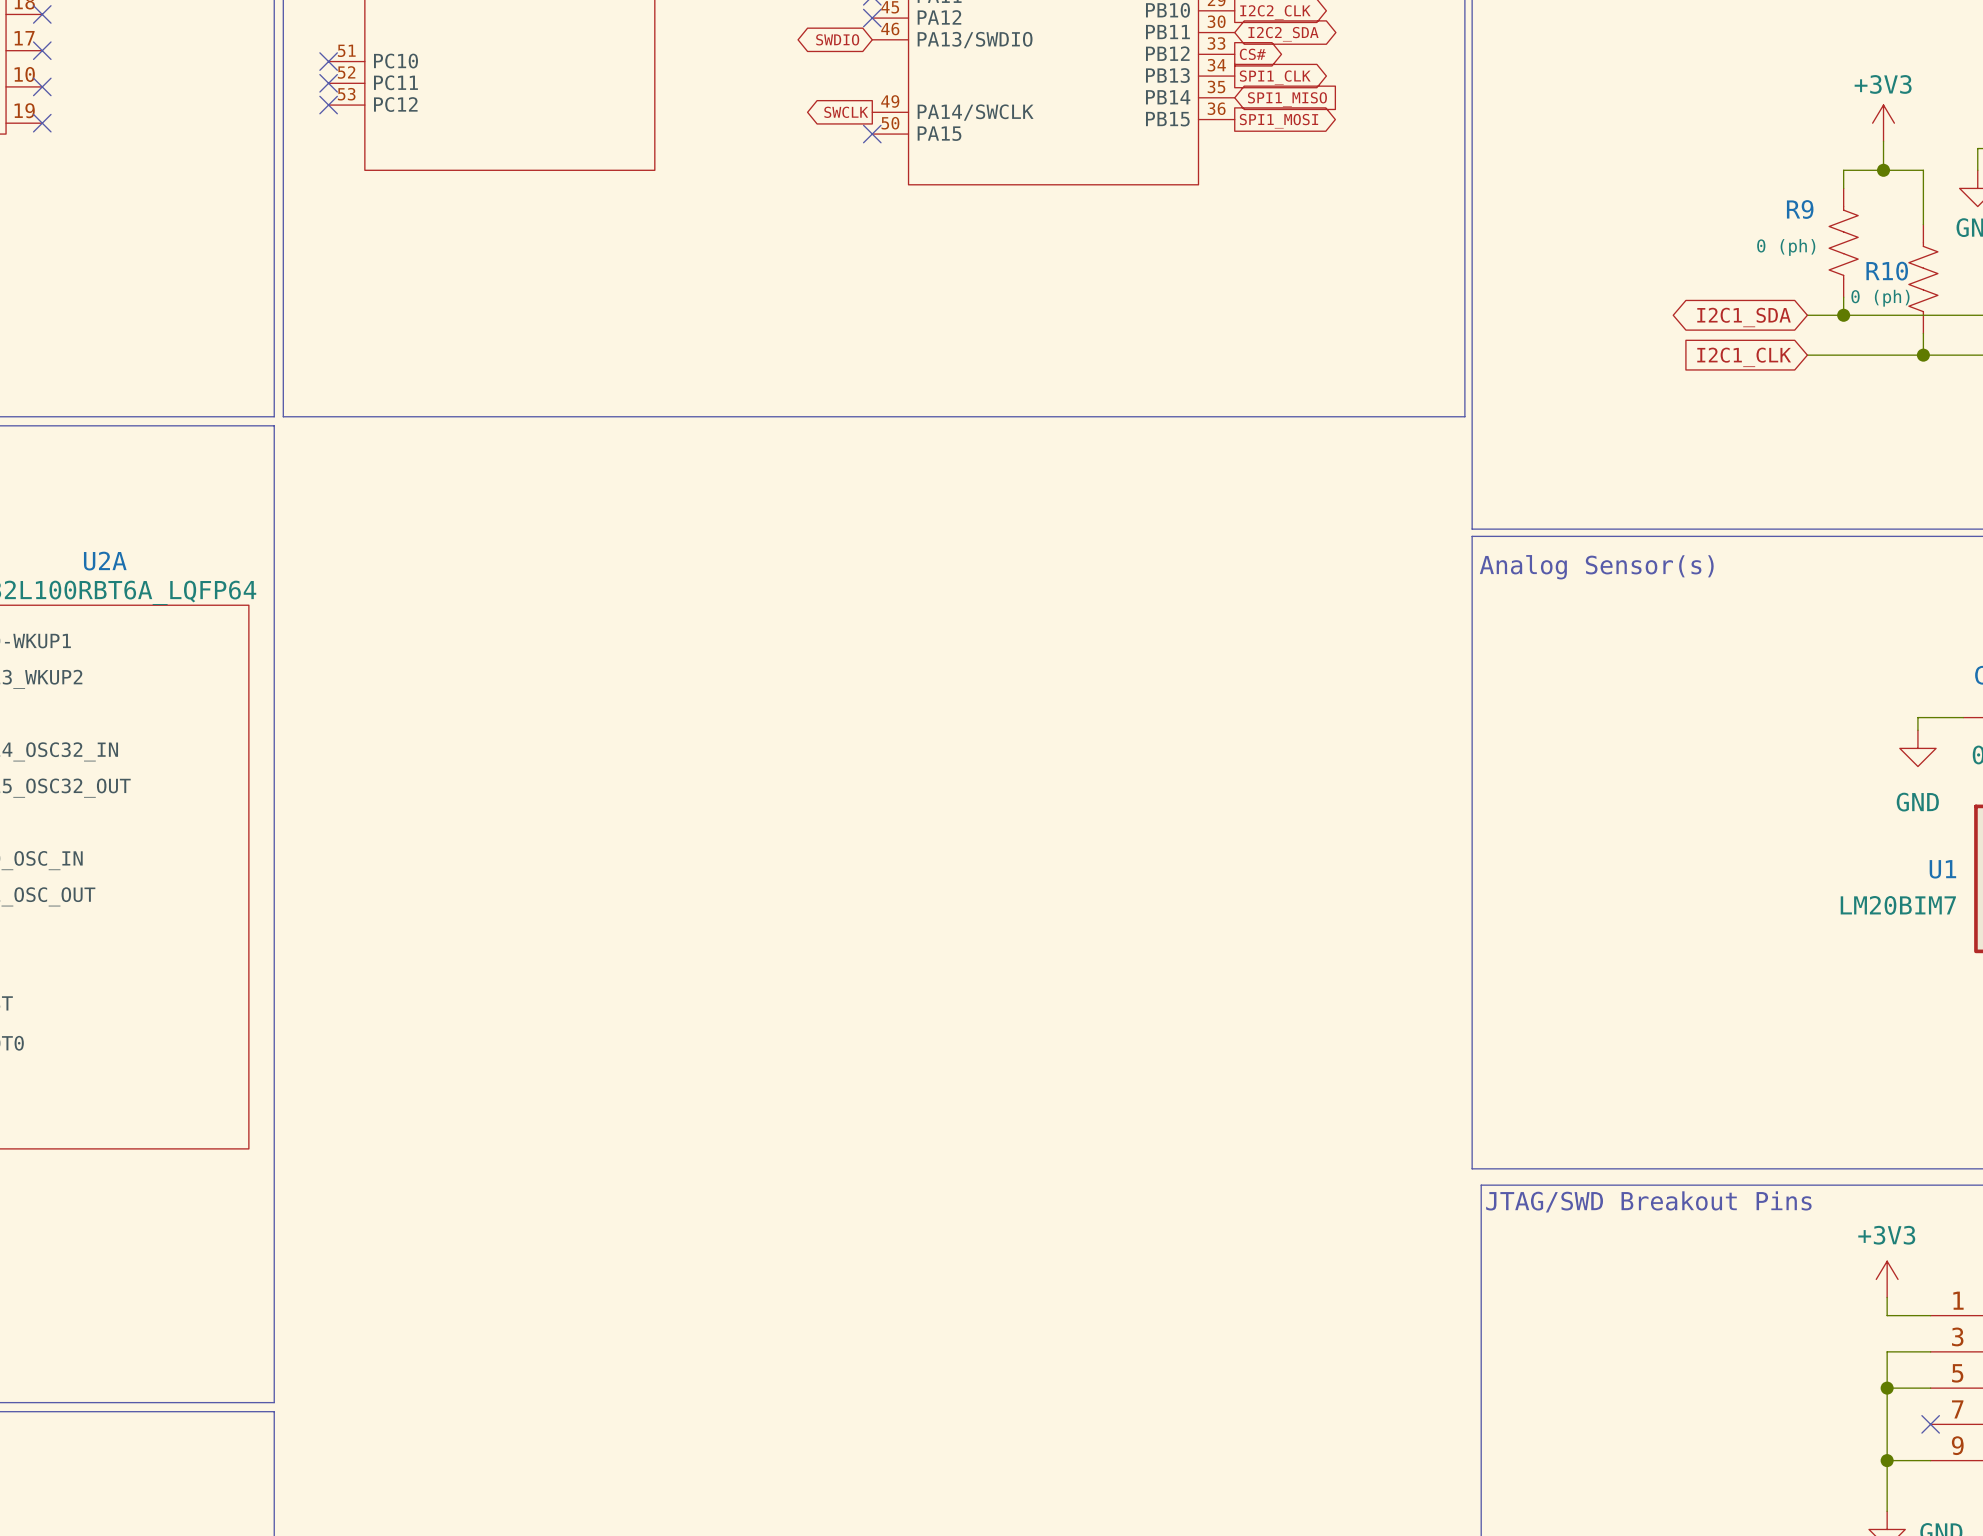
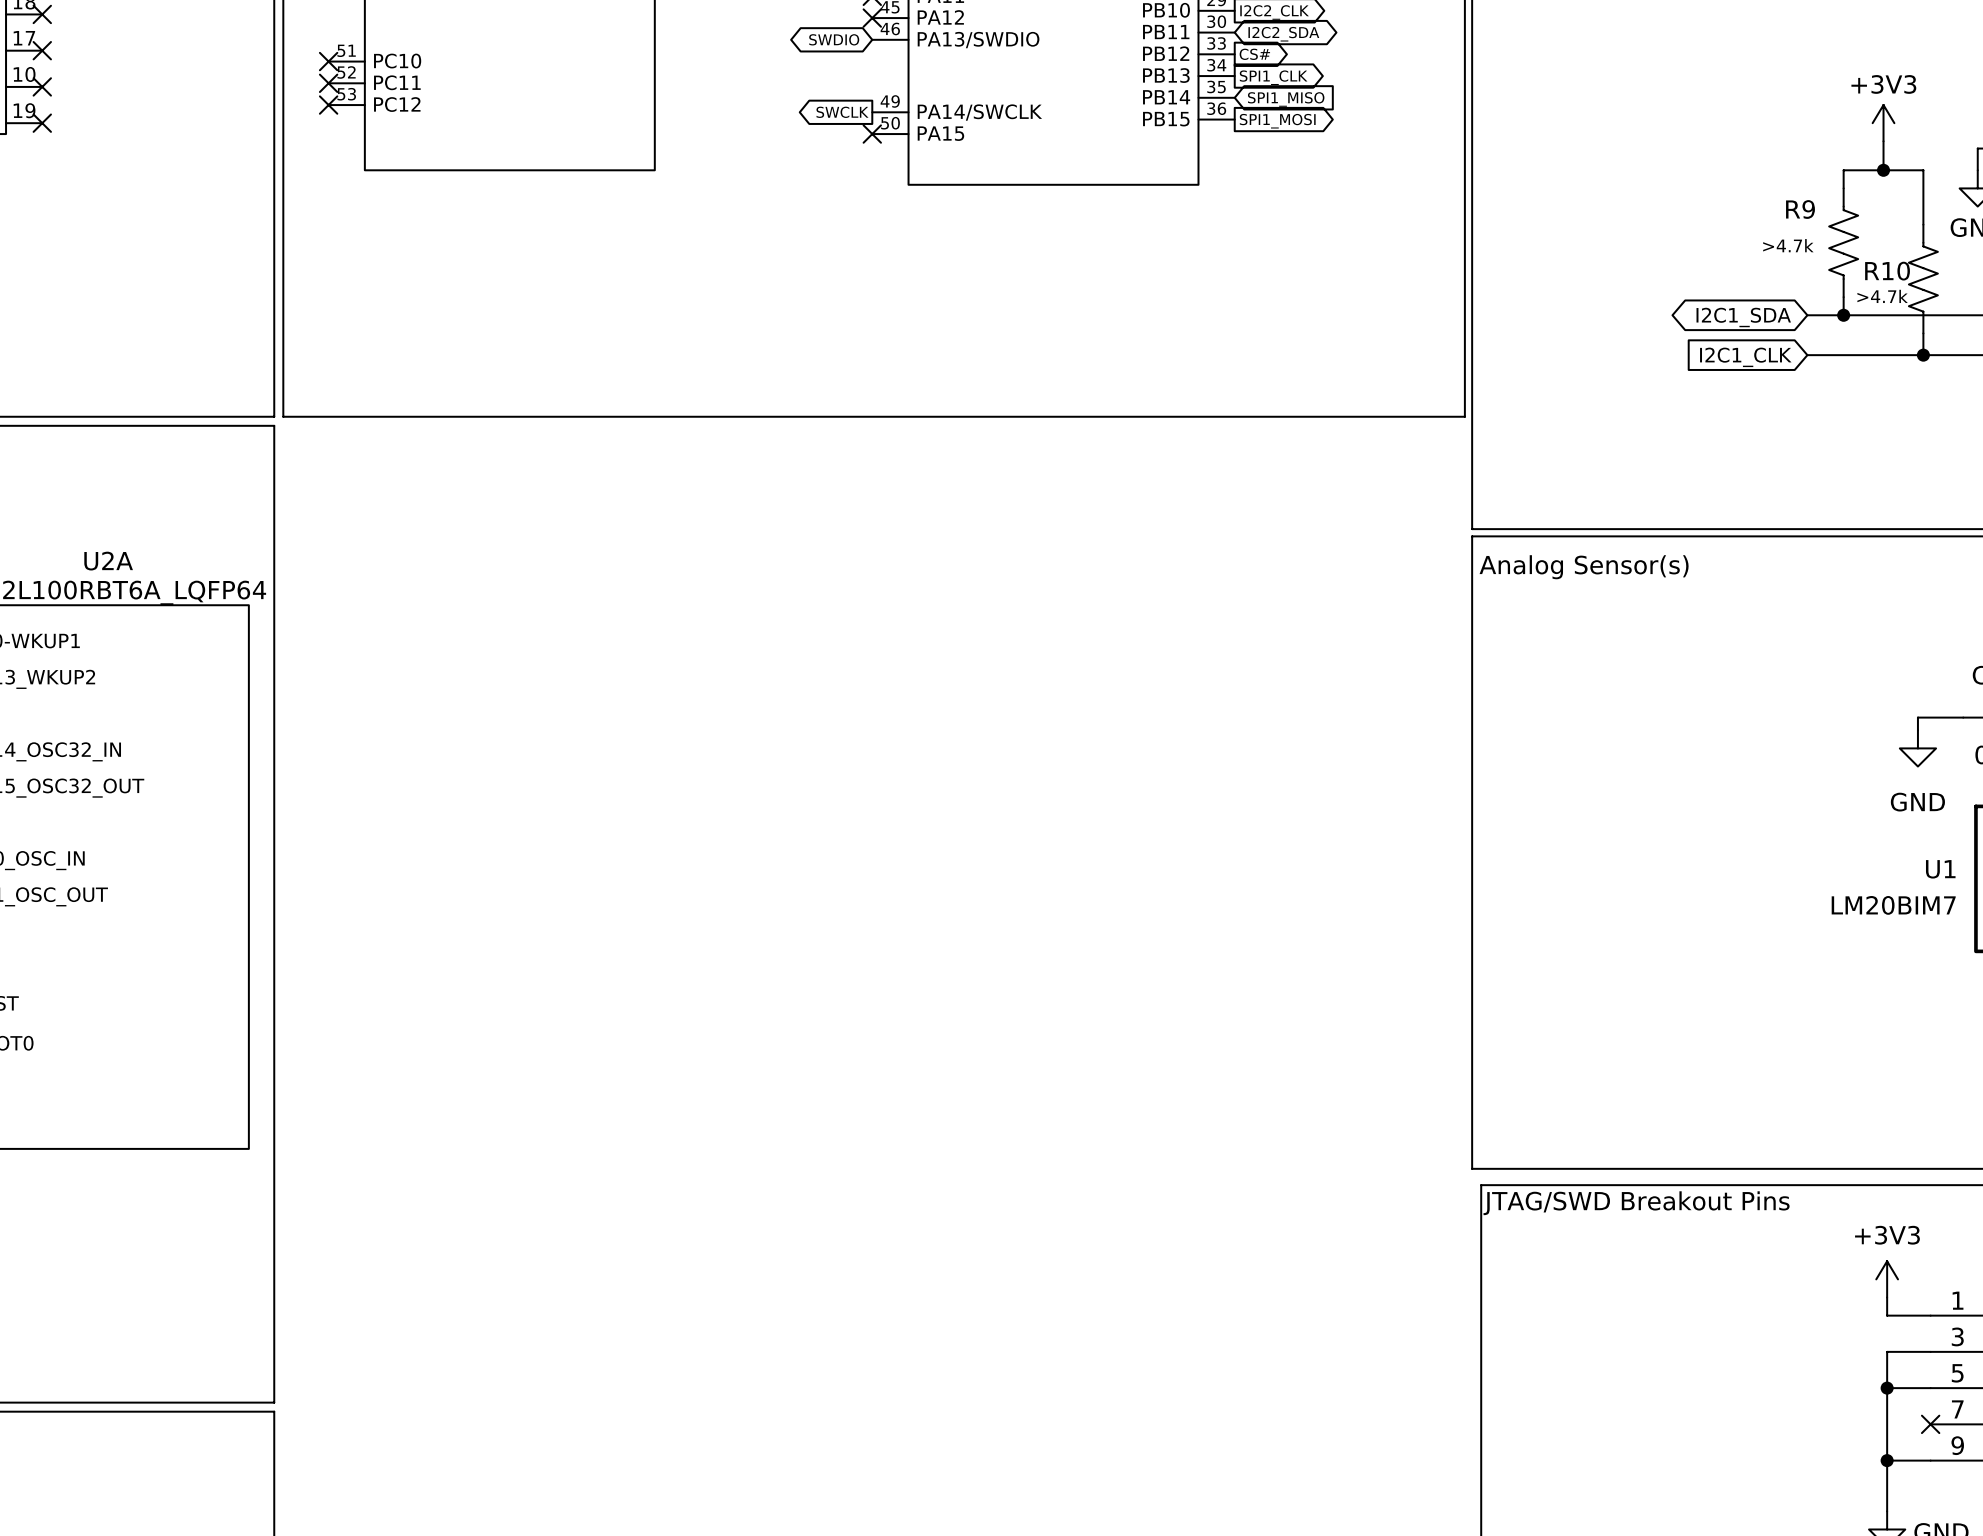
R9 value: 0 (ph) (1786, 247) -> >4.7k (1788, 245)
R10 value: 0 (ph) (1880, 298) -> >4.7k (1882, 296)

